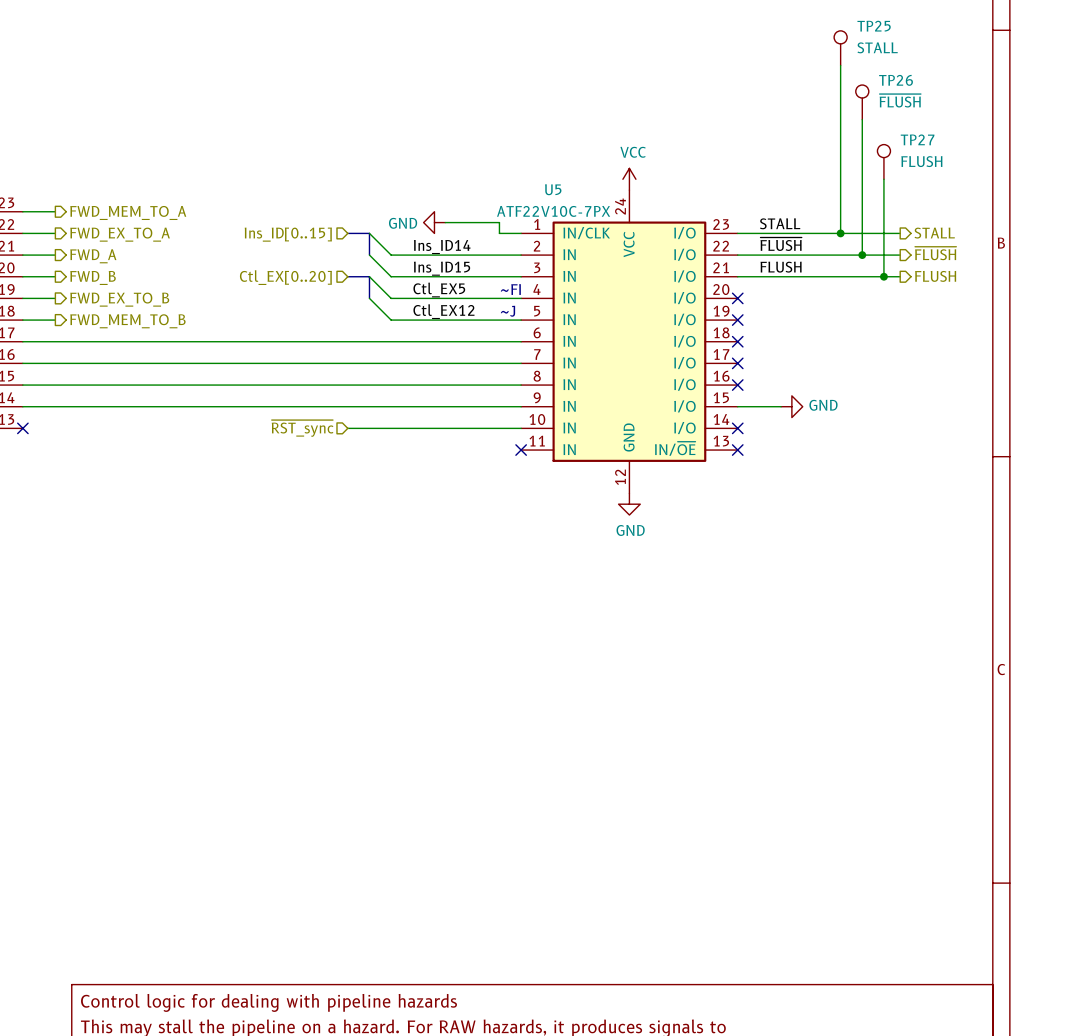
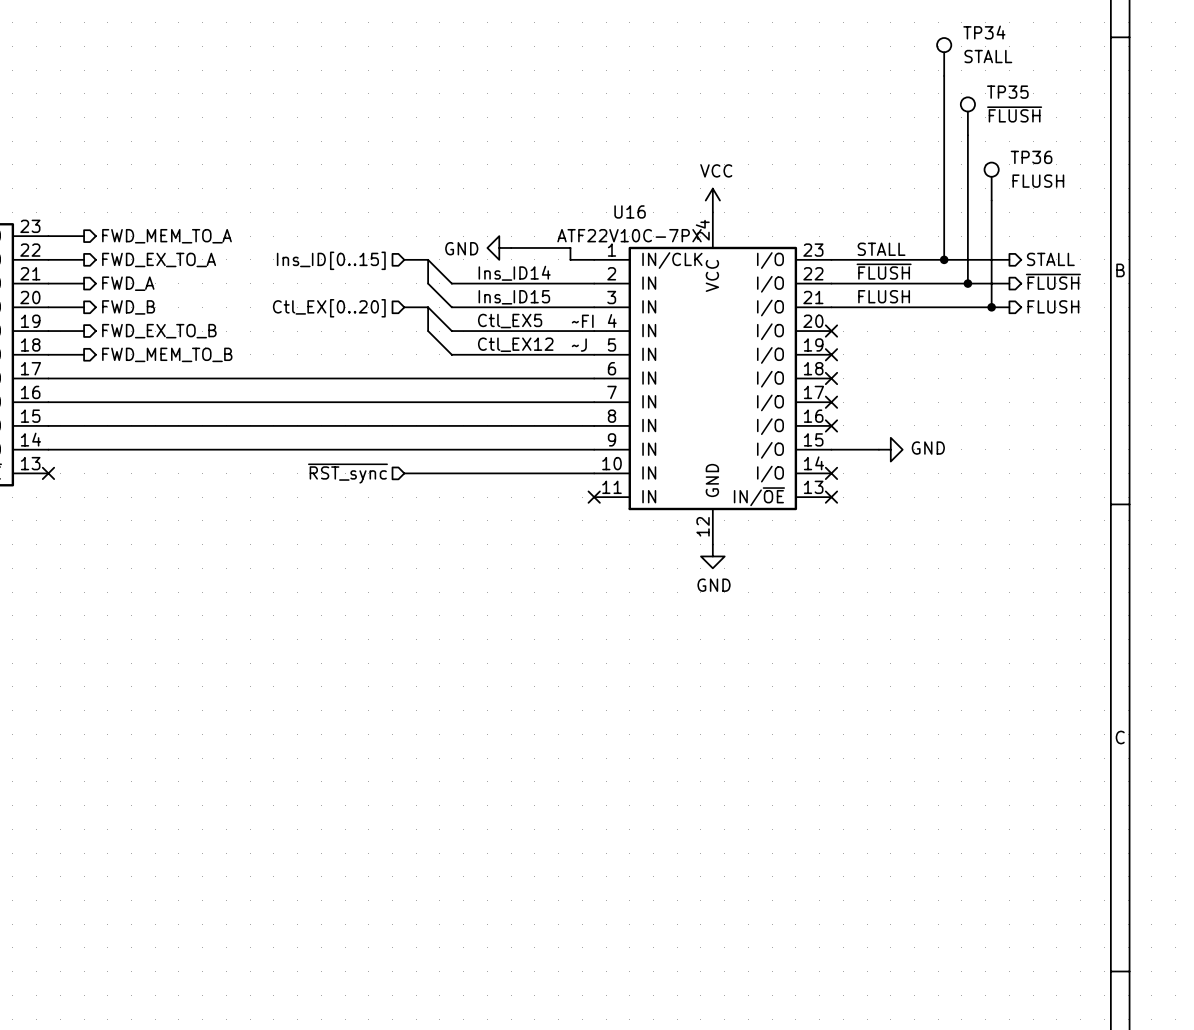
TP25 name: TP25 (874, 26) -> TP34 (984, 32)
TP26 name: TP26 (896, 80) -> TP35 (1007, 92)
TP27 name: TP27 (917, 139) -> TP36 (1031, 157)
U5 name: U5 (553, 189) -> U16 (630, 211)

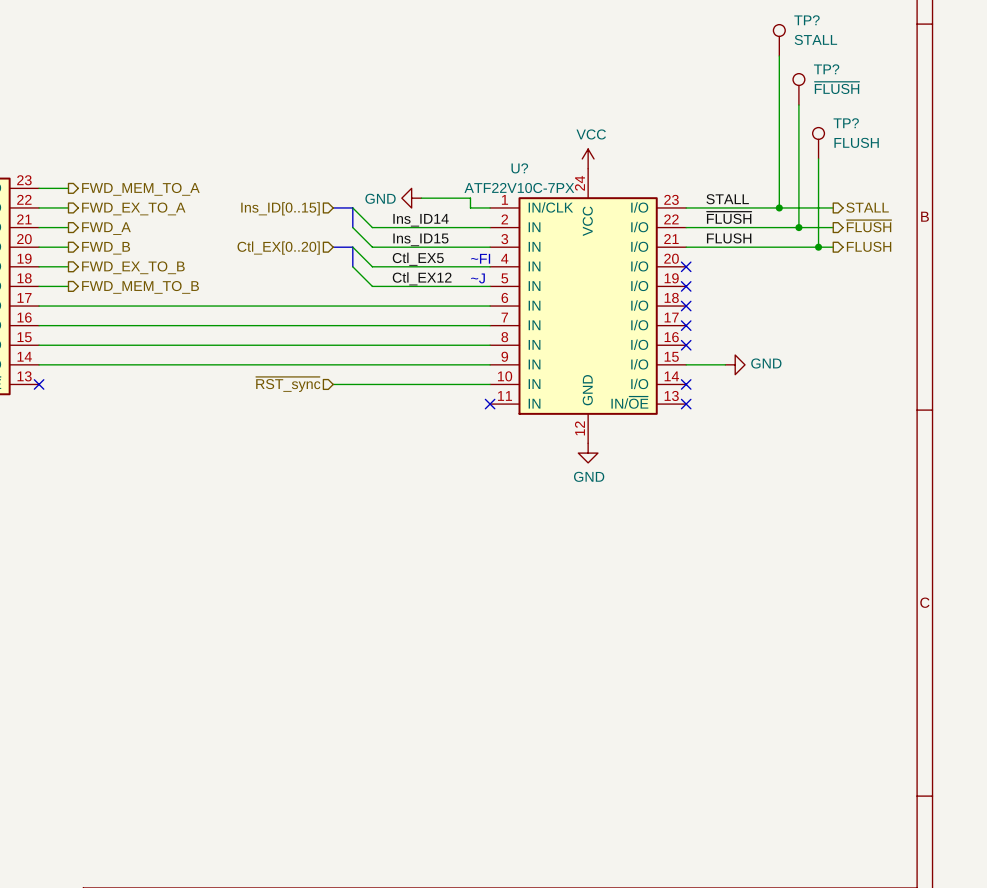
TP34 name: TP34 (984, 32) -> TP? (806, 20)
TP35 name: TP35 (1007, 92) -> TP? (826, 69)
TP36 name: TP36 (1031, 157) -> TP? (846, 123)
U16 name: U16 (630, 211) -> U? (519, 168)

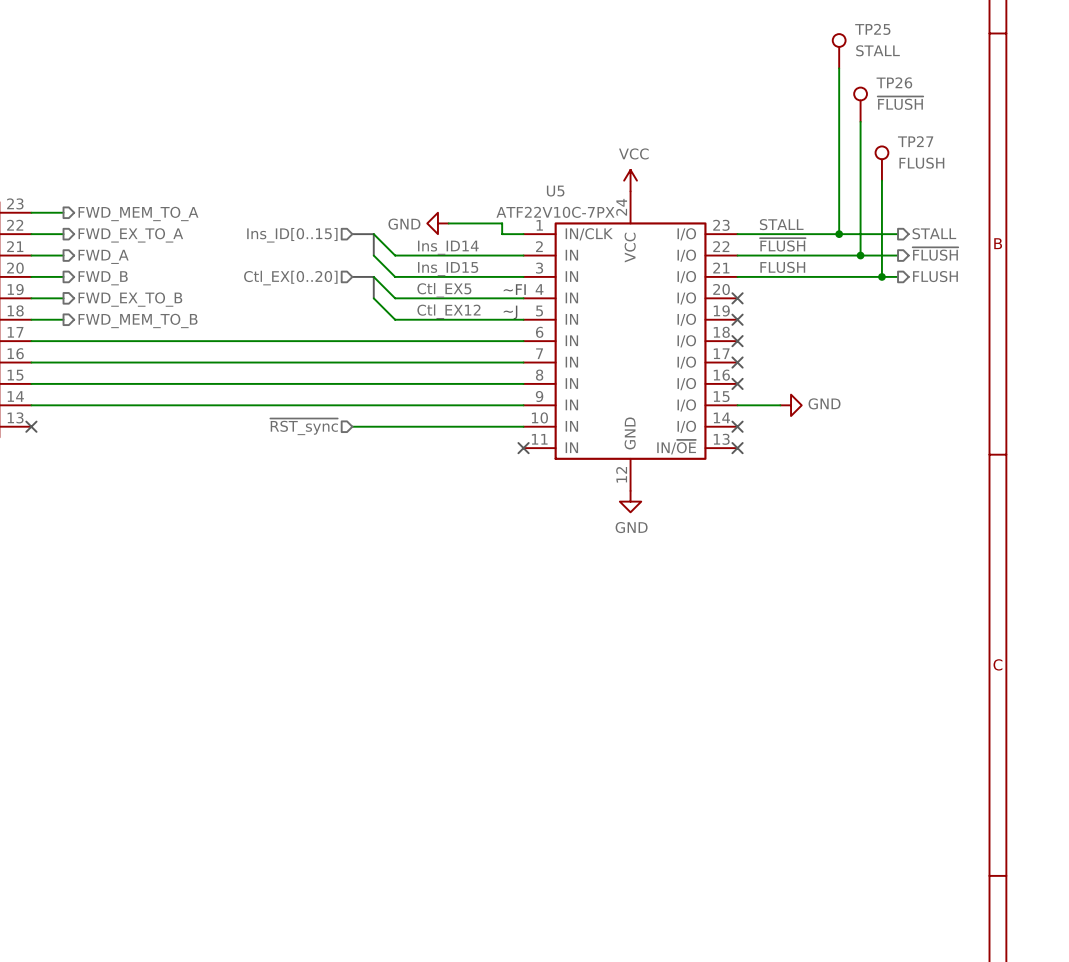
TP? name: TP? (806, 20) -> TP25 (872, 29)
TP? name: TP? (826, 69) -> TP26 (894, 82)
TP? name: TP? (846, 123) -> TP27 (915, 141)
U? name: U? (519, 168) -> U5 (555, 191)

